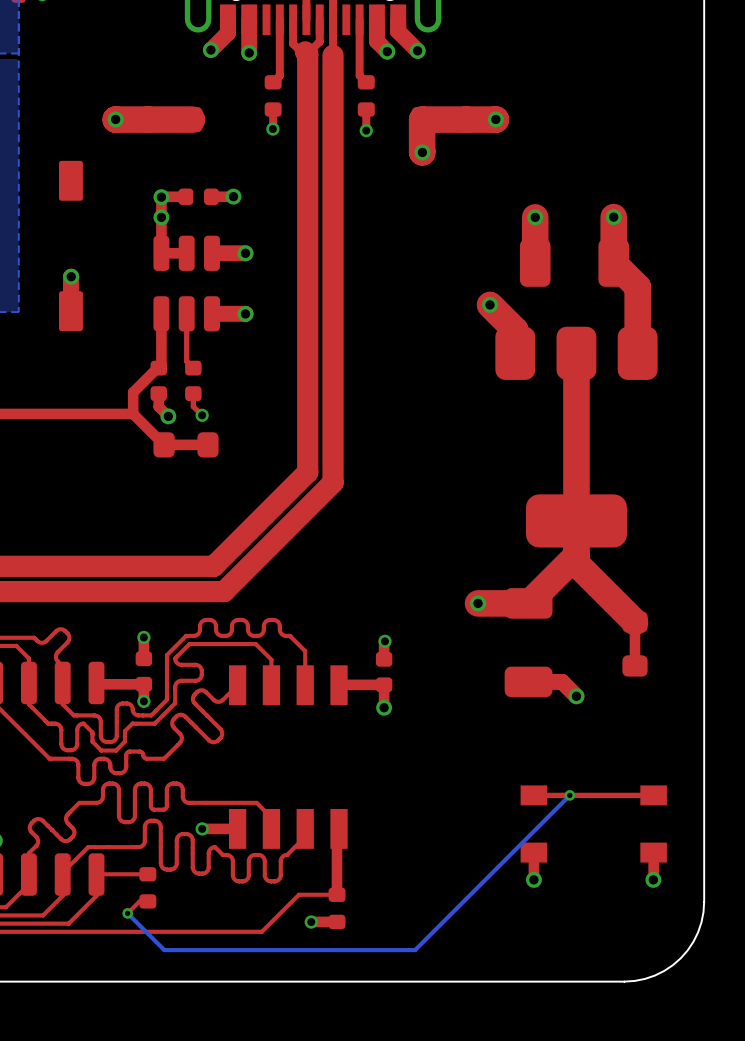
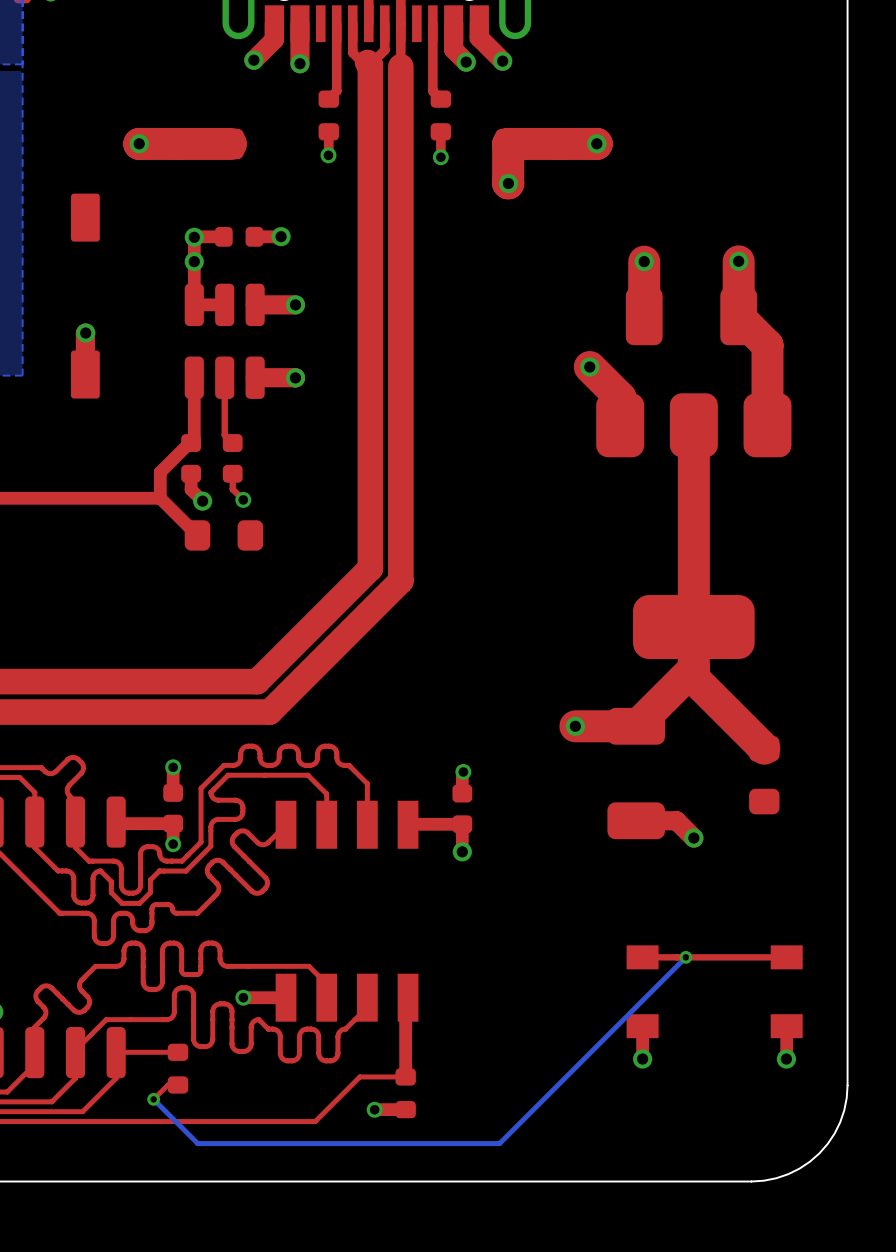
top track: (207, 444) (164, 444) -> none
top track: (635, 622) (635, 665) -> none

